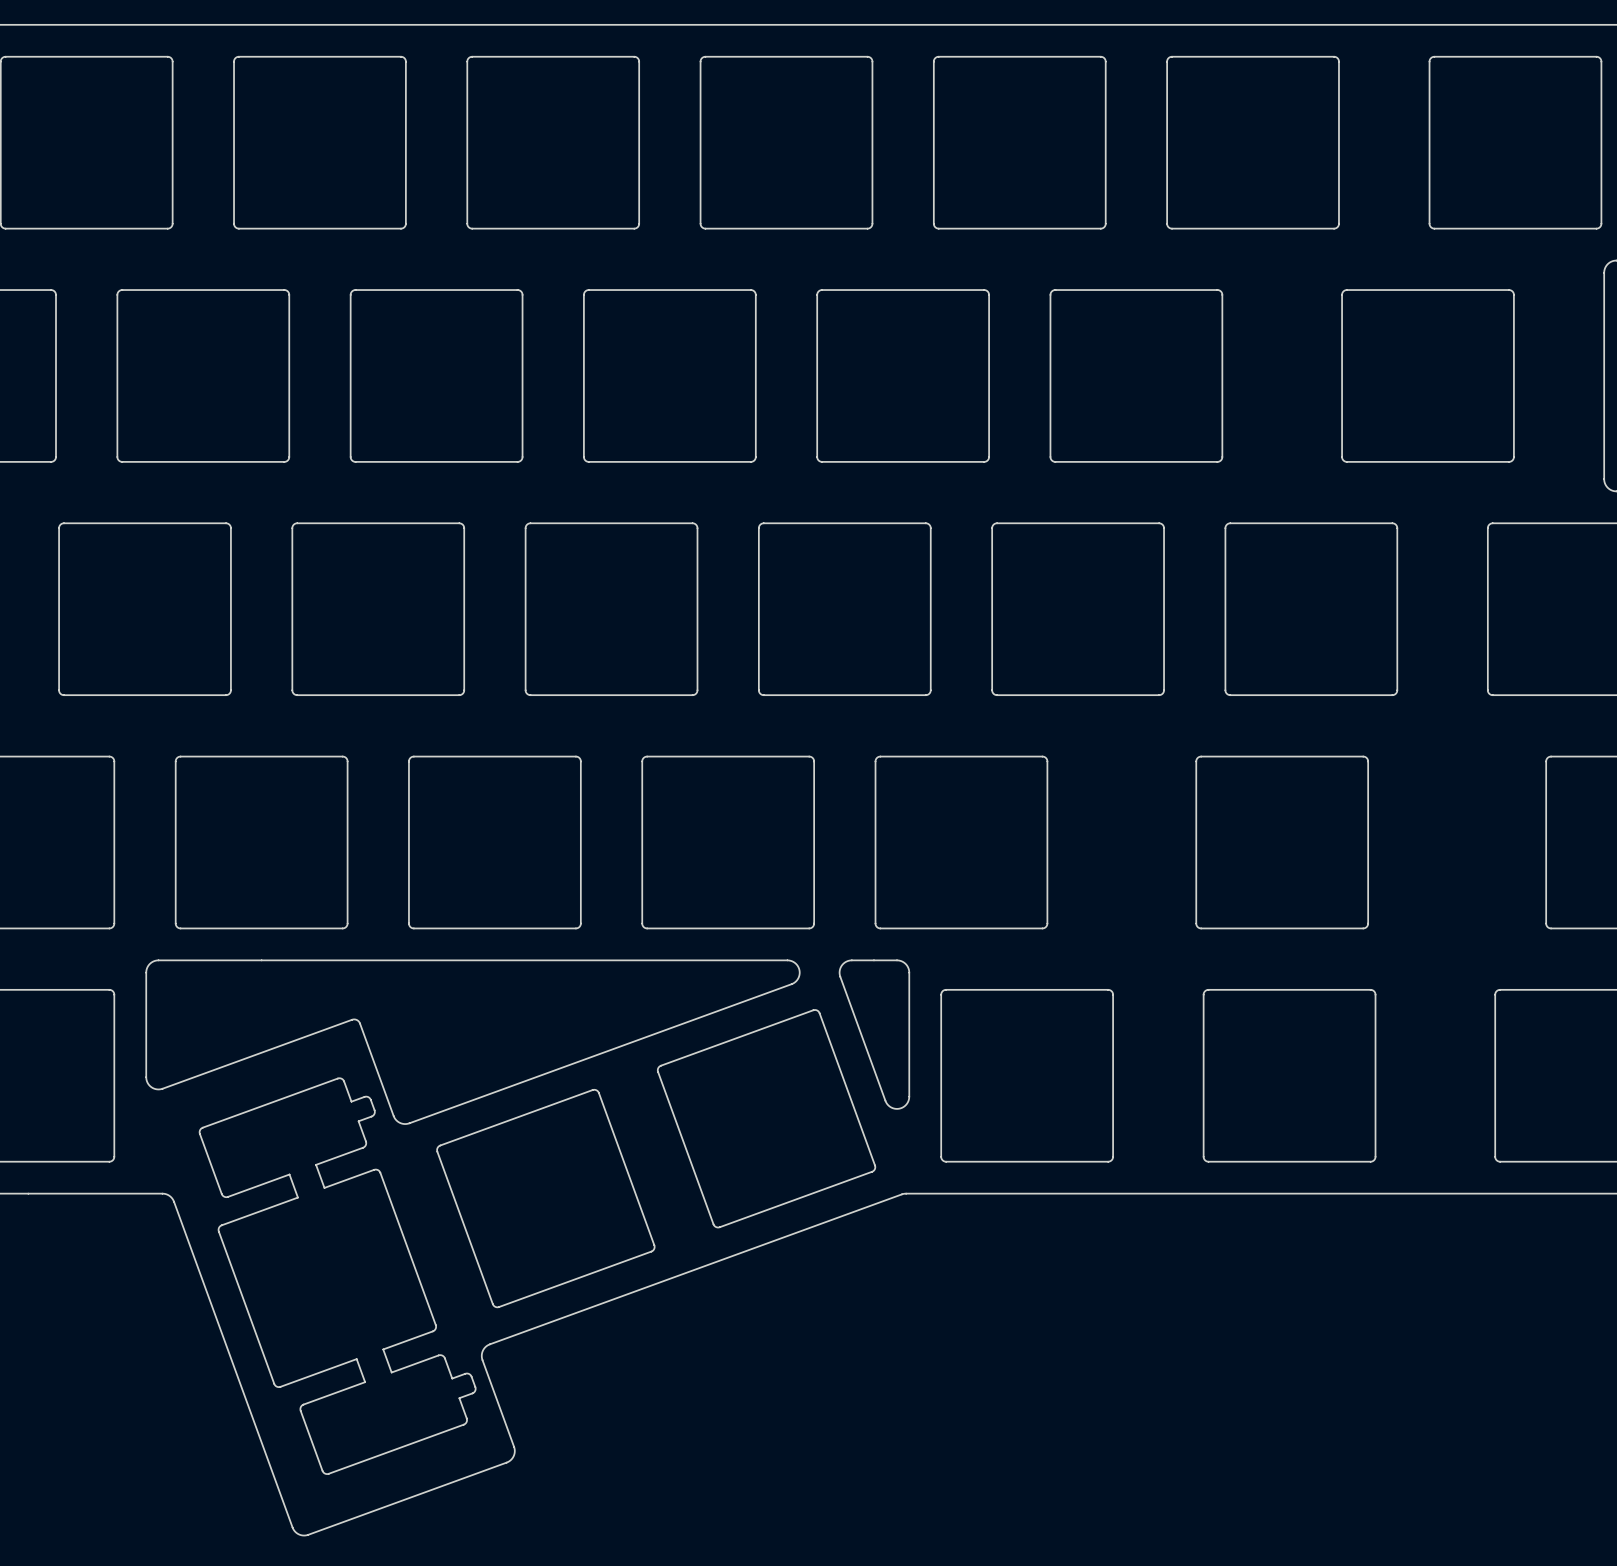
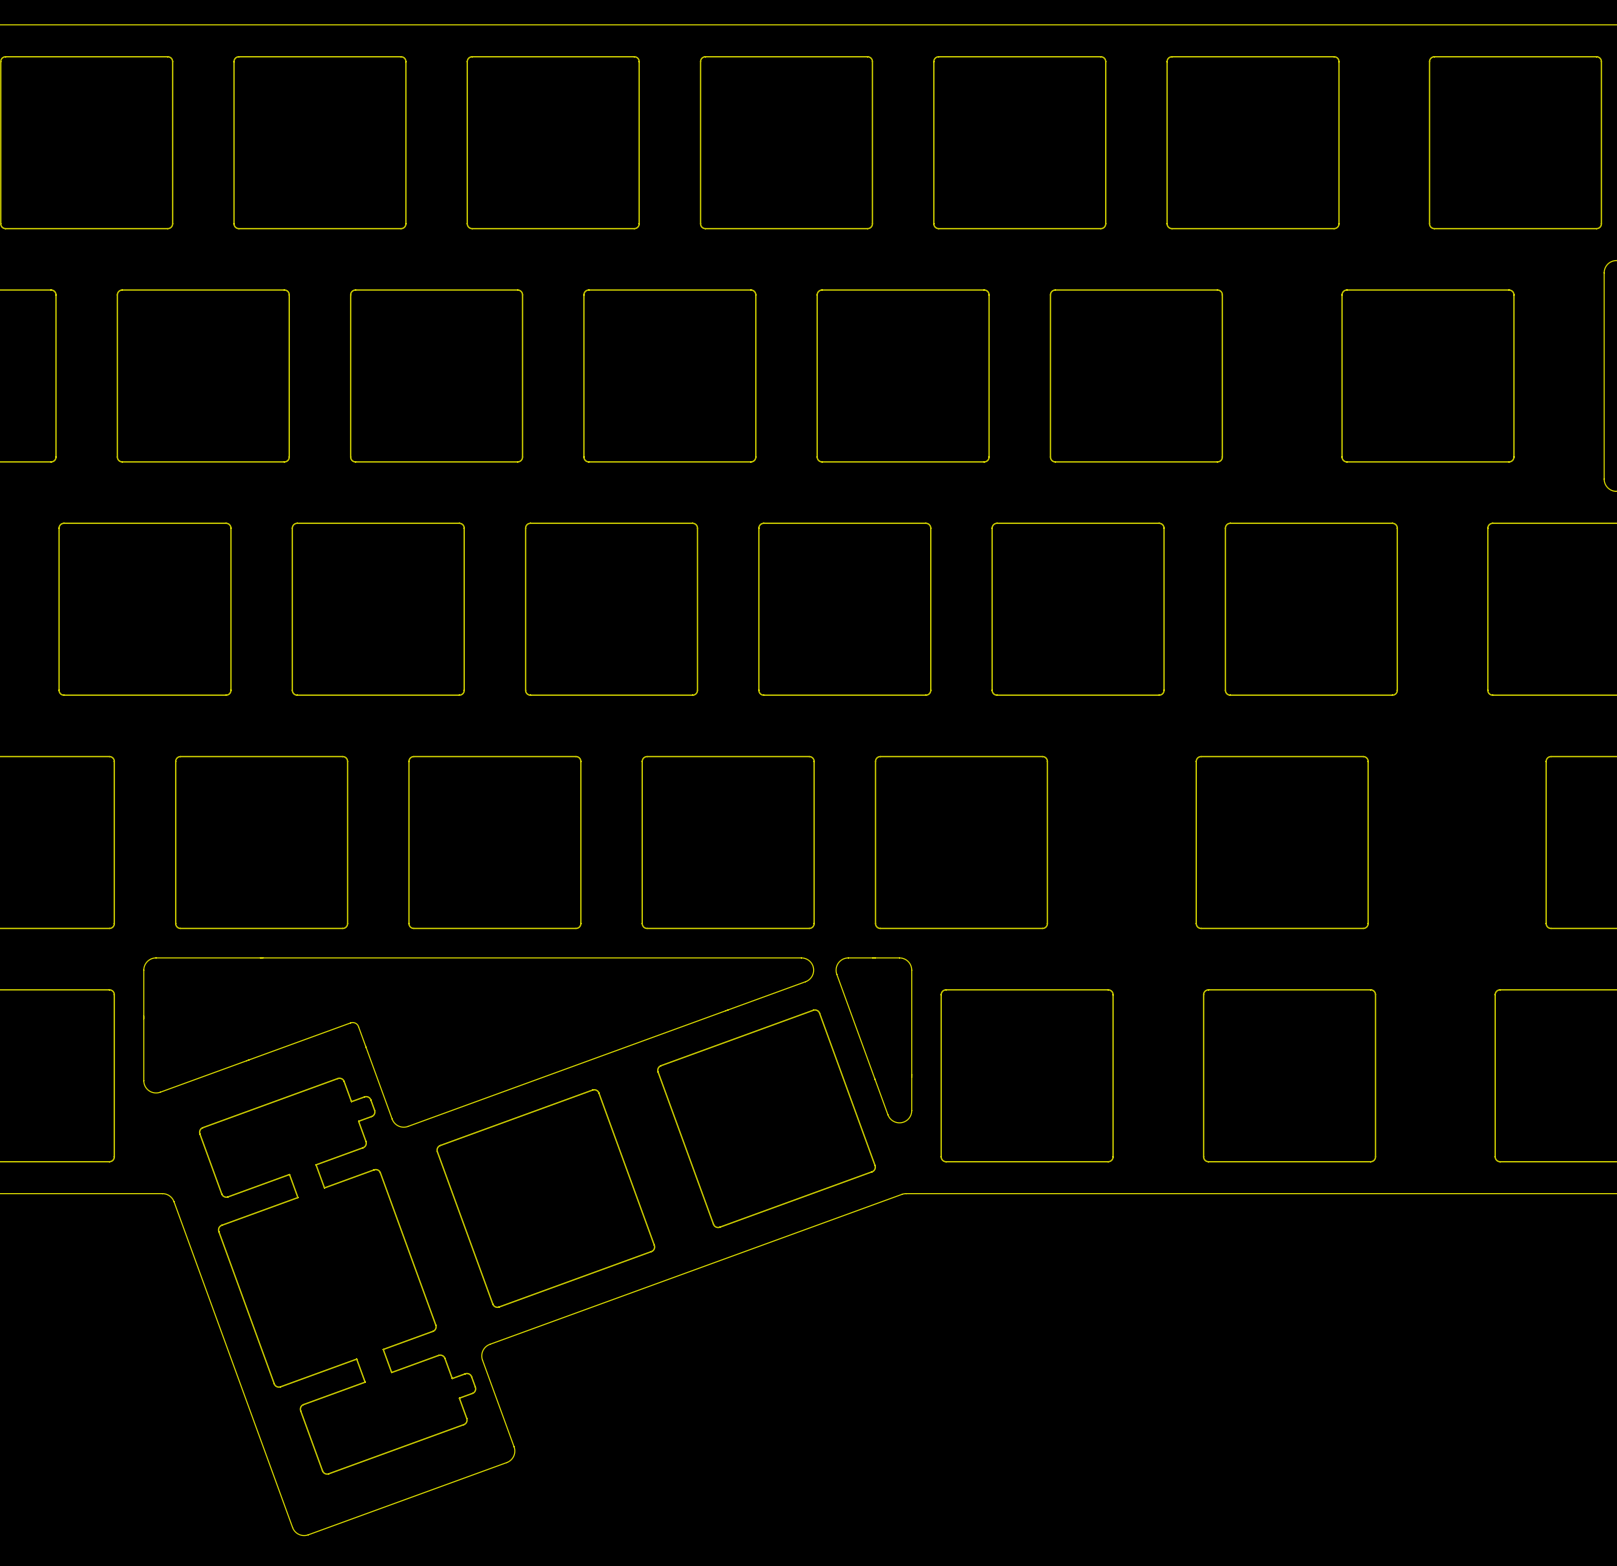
board edge: (787, 960) (155, 960) (149, 963) (146, 971) (146, 1080) (152, 1088) (161, 1089) (355, 1019) (359, 1023) (394, 1117) (400, 1122) (408, 1123) (791, 984) (797, 979) (799, 970) (795, 963) (787, 960) -> (801, 957) (808, 960) (813, 968) (812, 975) (805, 981) (406, 1126) (398, 1126) (392, 1120) (358, 1026) (354, 1022) (158, 1092) (150, 1091) (144, 1083) (143, 968) (146, 962) (153, 958) (801, 957)
board edge: (897, 960) (848, 960) (841, 965) (839, 972) (885, 1100) (890, 1106) (897, 1108) (904, 1106) (909, 1098) (909, 972) (905, 963) (897, 960) -> (899, 957) (908, 961) (911, 970) (911, 1112) (907, 1120) (900, 1122) (892, 1120) (887, 1114) (836, 970) (838, 963) (845, 958) (899, 957)

